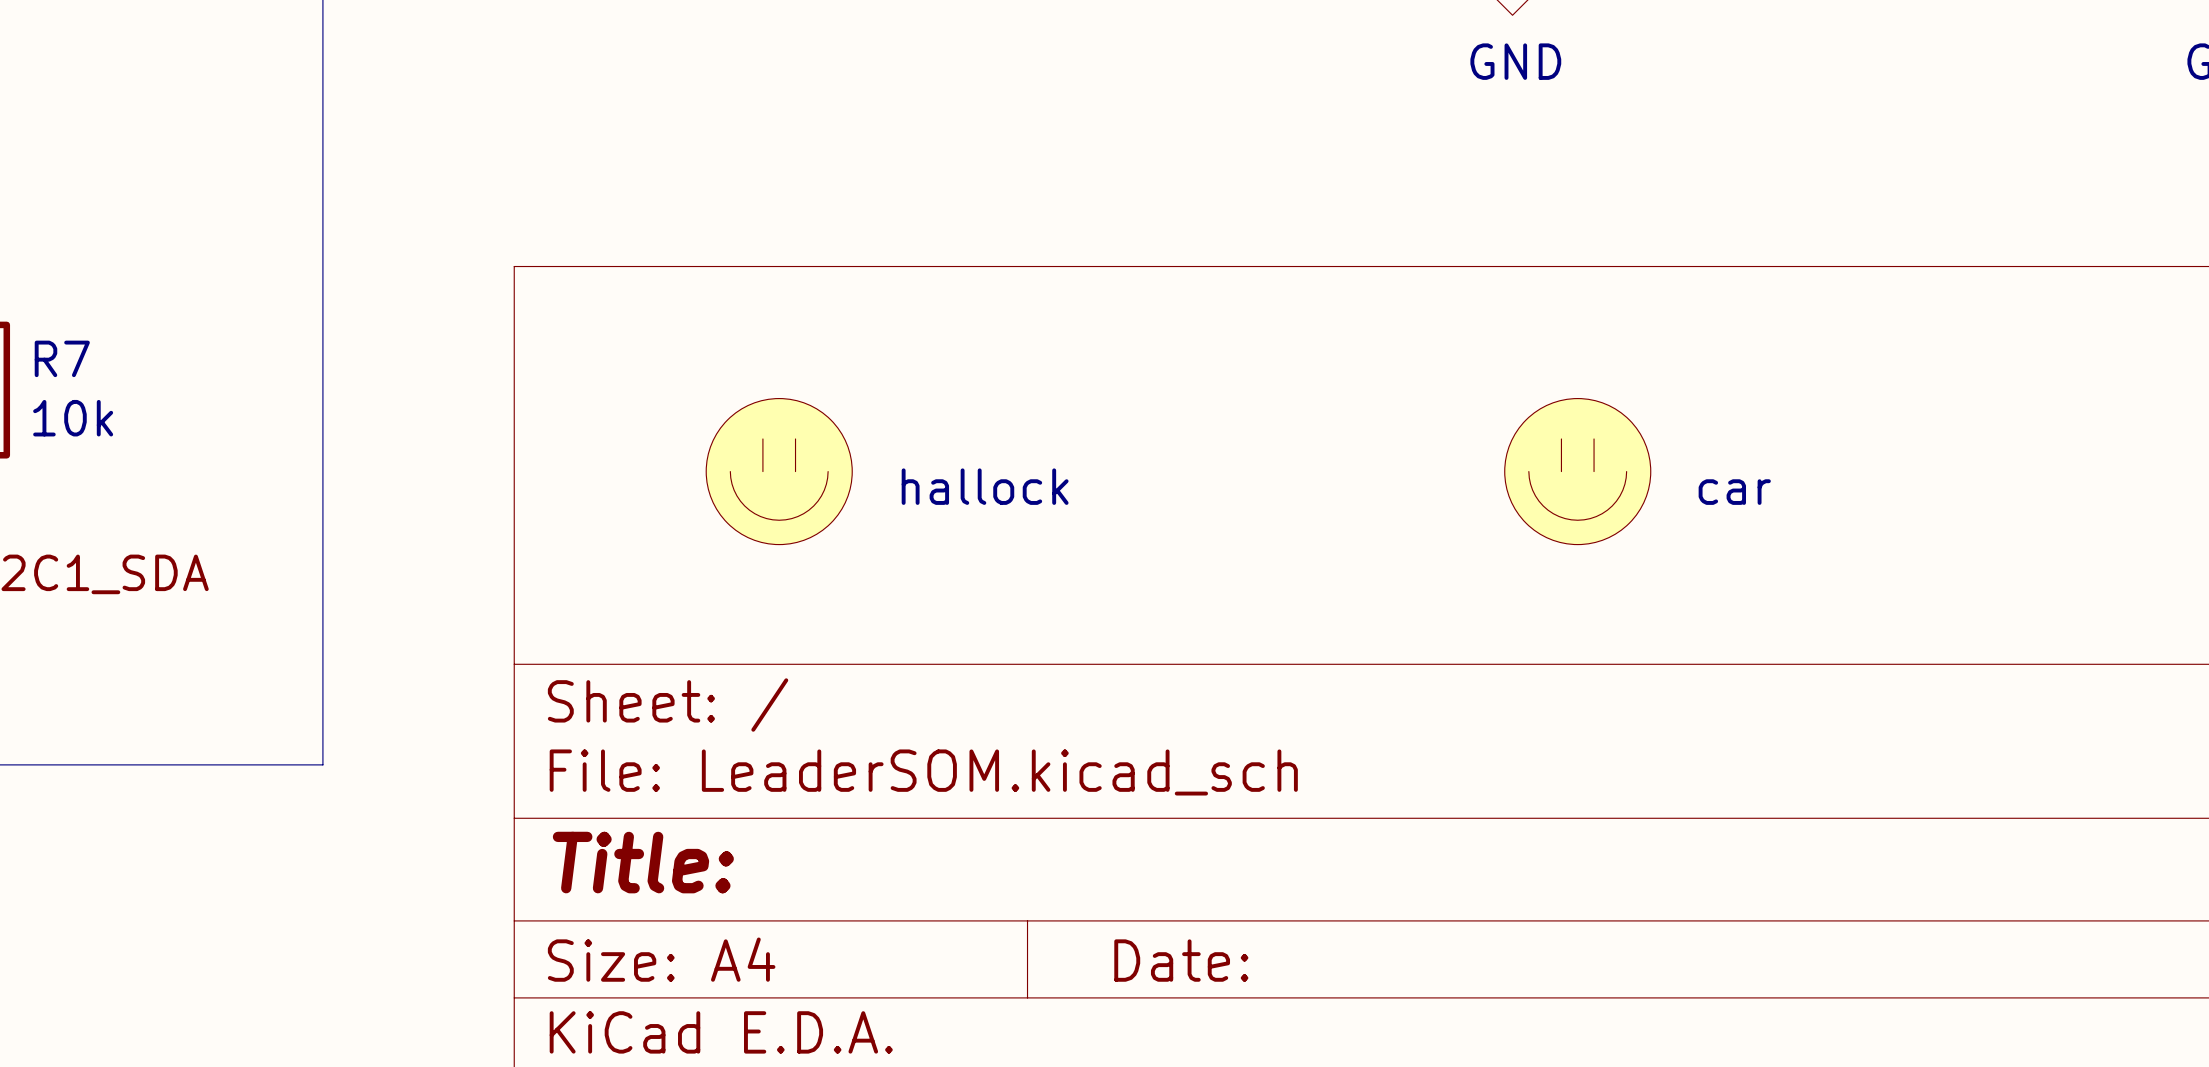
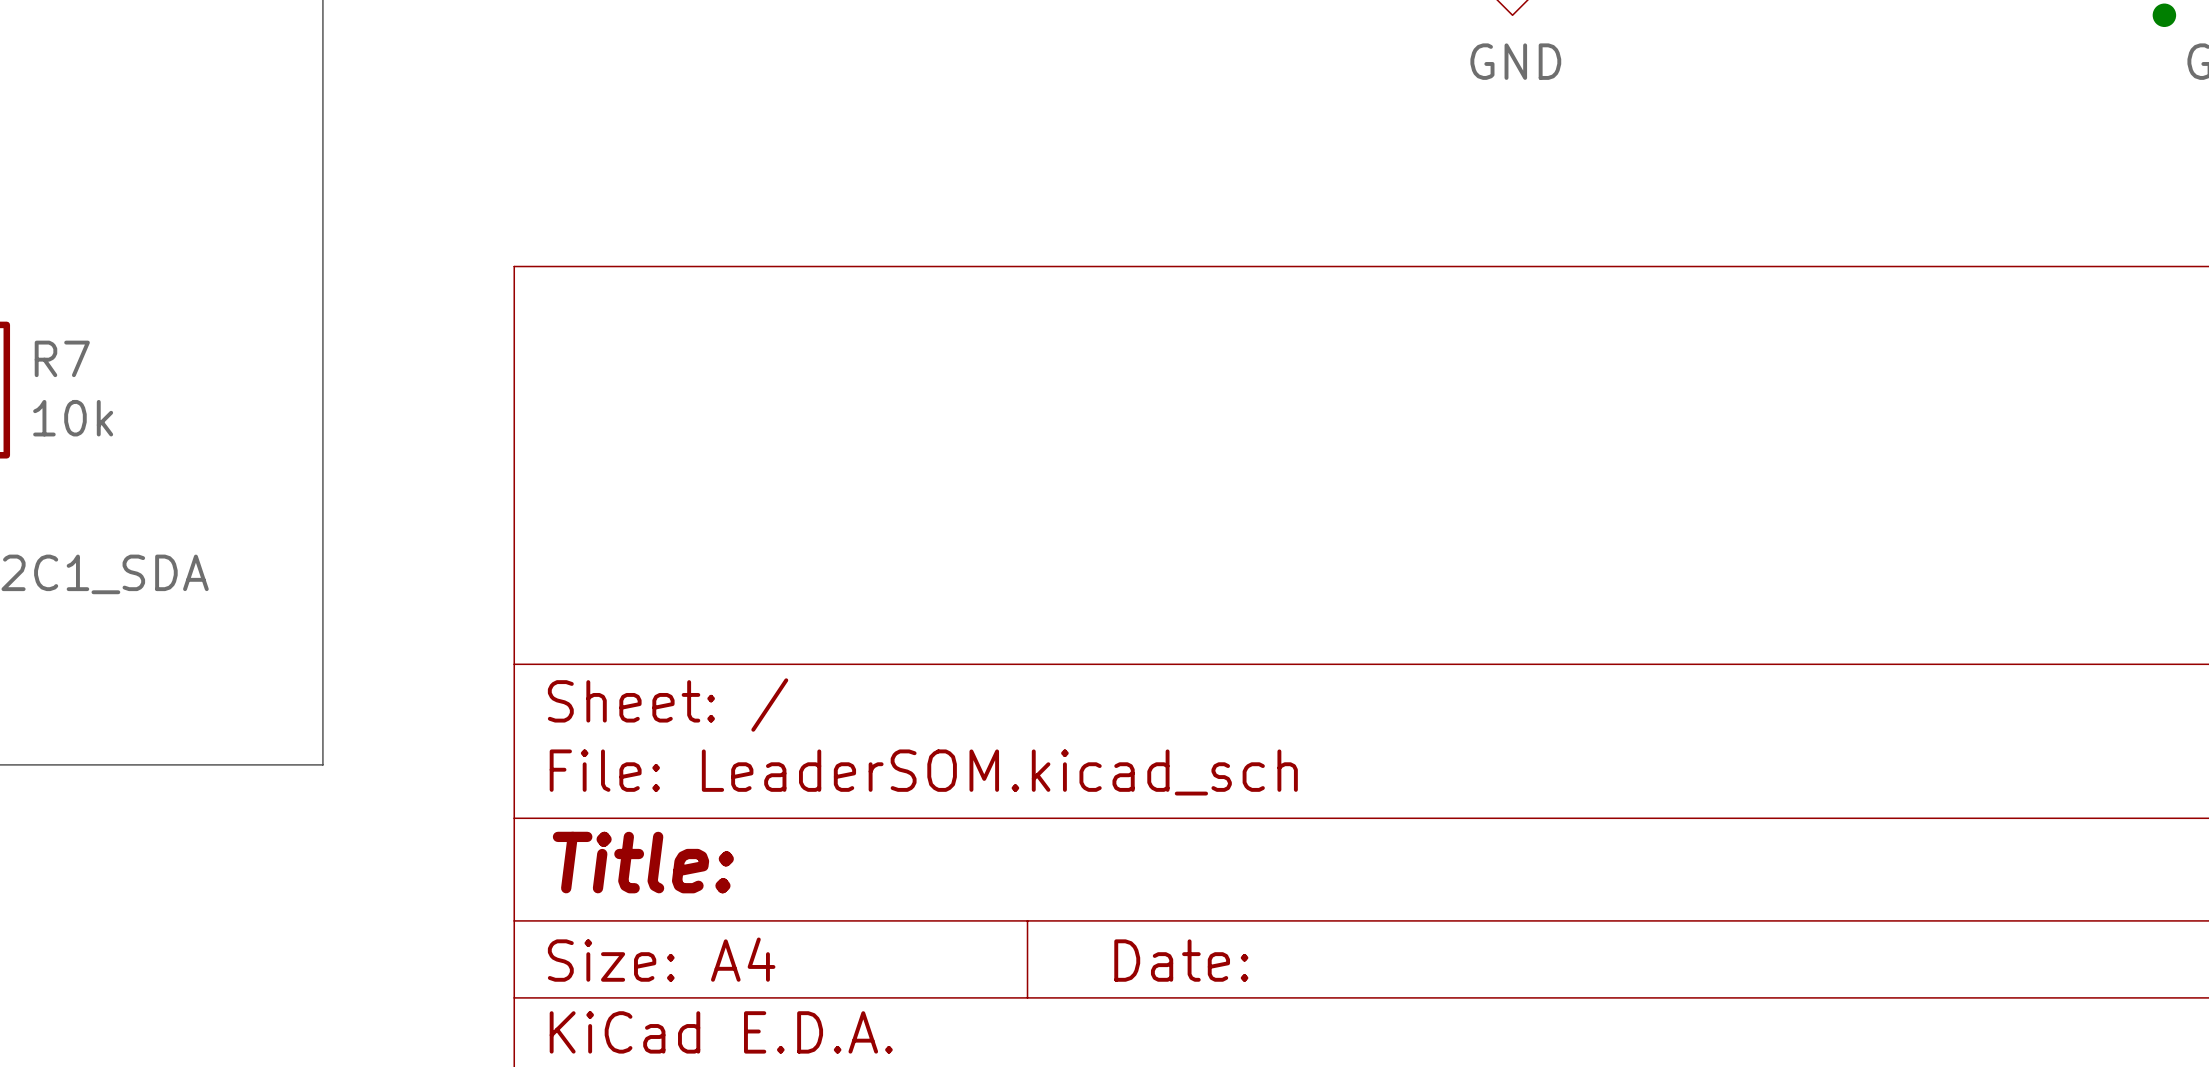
junction: none -> (2164, 15)
part: hallock (779, 471) -> none
part: car (1577, 471) -> none

